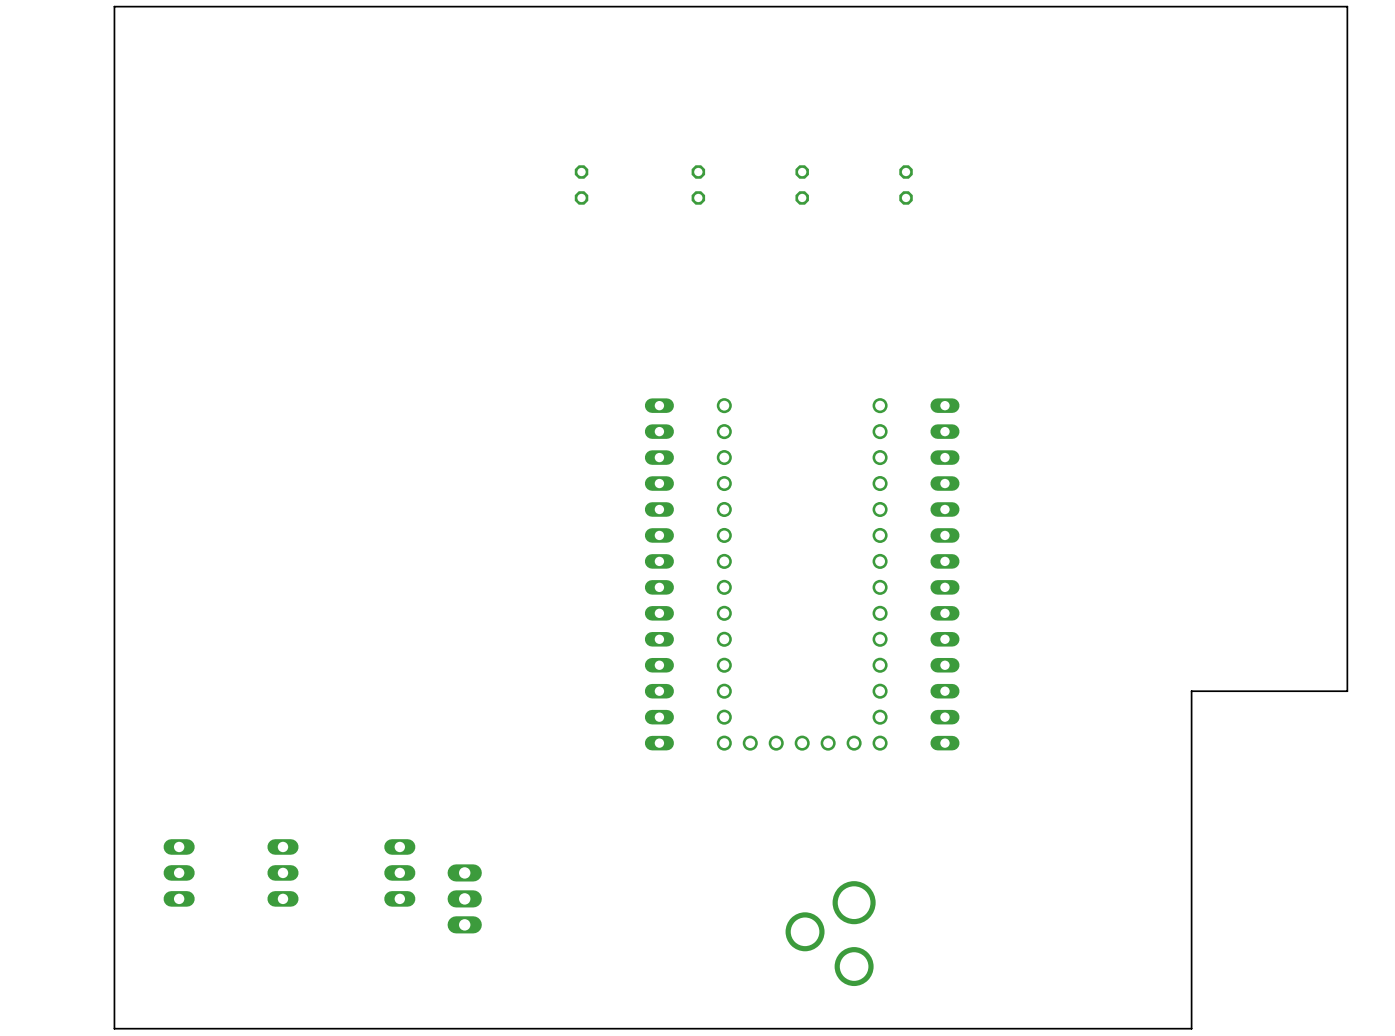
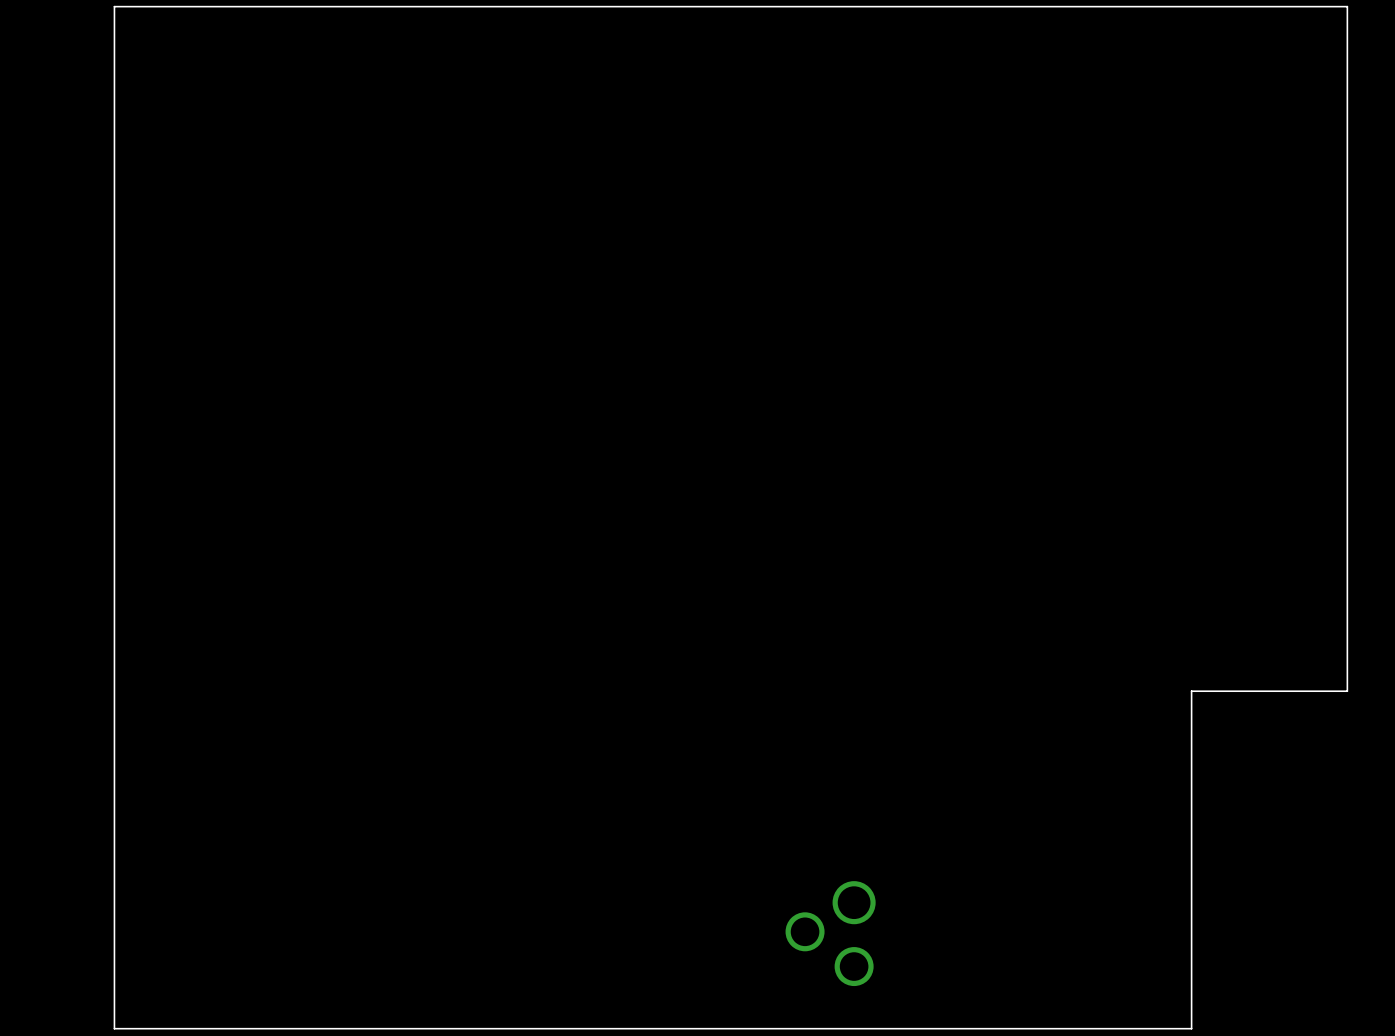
part: (581, 184) -> none
part: (698, 184) -> none
part: (802, 184) -> none
part: (906, 184) -> none
part: (659, 574) -> none
part: (802, 574) -> none
part: (944, 574) -> none
part: (179, 872) -> none
part: (282, 872) -> none
part: (399, 872) -> none
part: (464, 898) -> none

